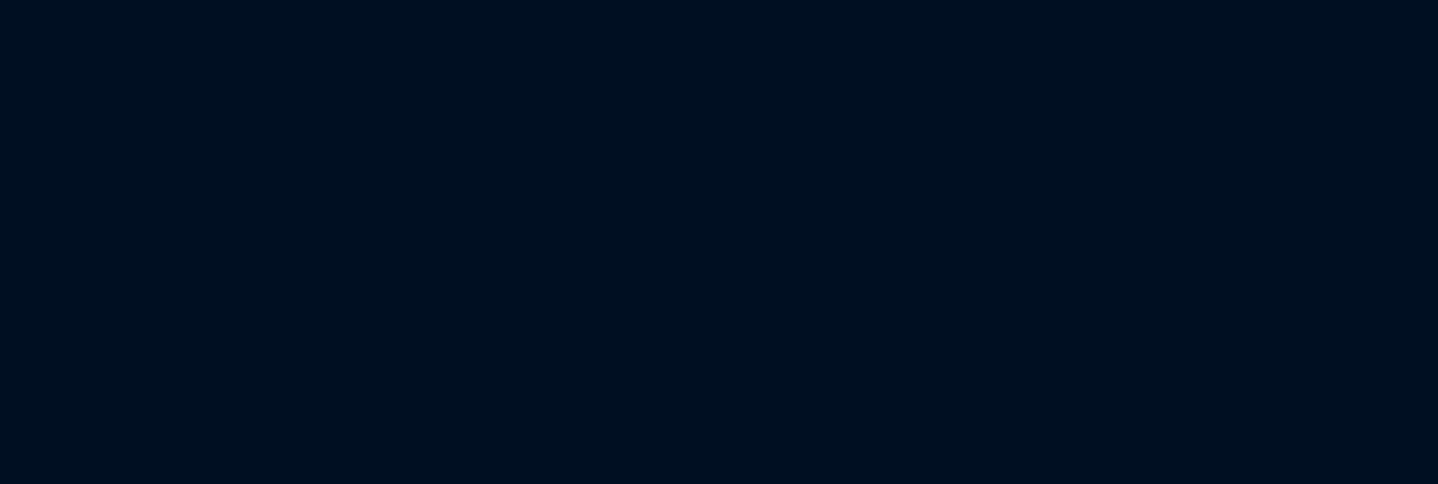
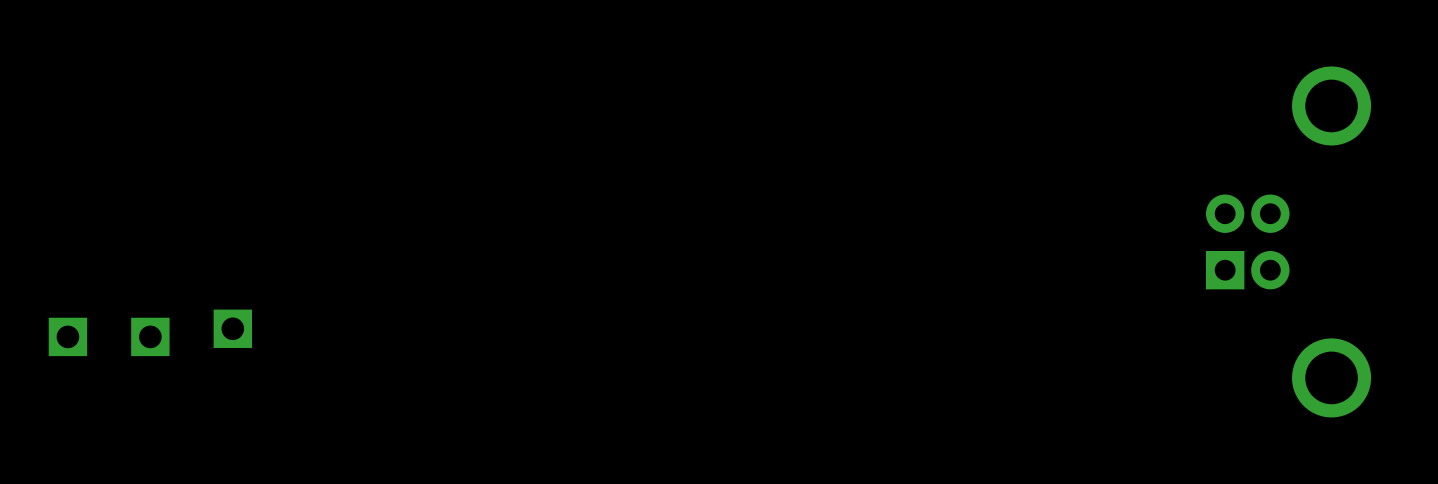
part: none -> (1288, 241)
part: none -> (232, 328)
part: none -> (67, 336)
part: none -> (150, 336)

